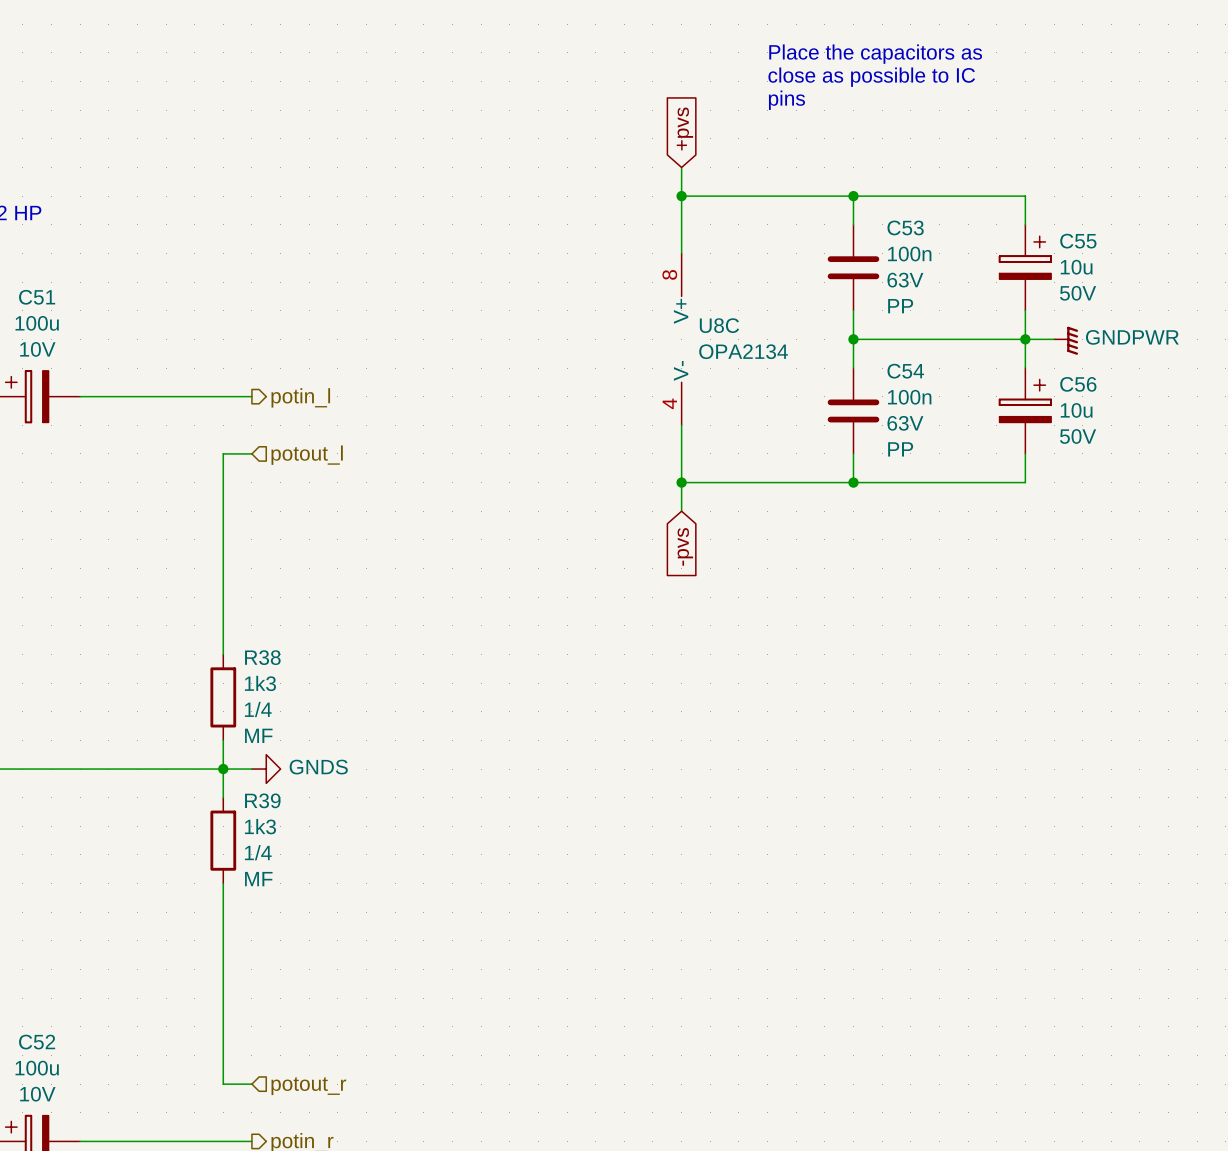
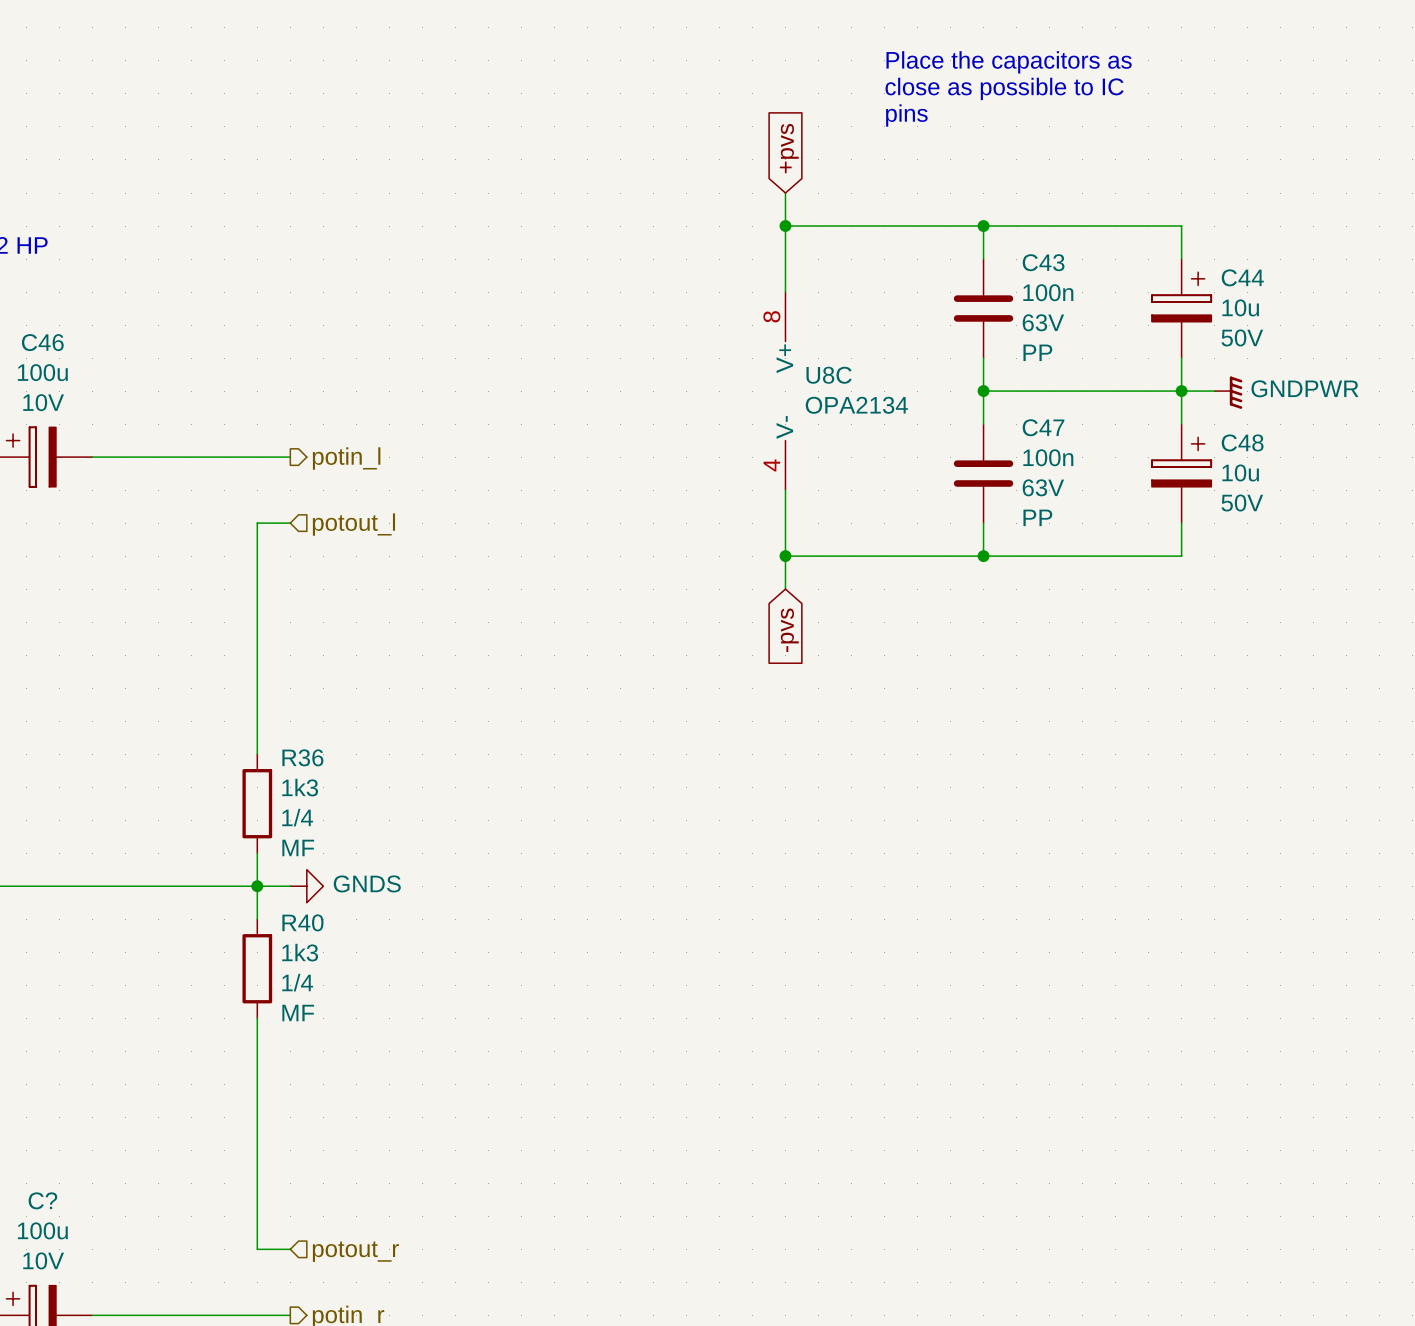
C53 name: C53 (905, 227) -> C43 (1043, 262)
C55 name: C55 (1078, 241) -> C44 (1242, 277)
C51 name: C51 (37, 297) -> C46 (42, 342)
C54 name: C54 (905, 371) -> C47 (1043, 427)
C56 name: C56 (1078, 384) -> C48 (1242, 442)
R38 name: R38 (262, 657) -> R36 (302, 757)
R39 name: R39 (262, 800) -> R40 (302, 922)
C52 name: C52 (37, 1042) -> C? (42, 1200)

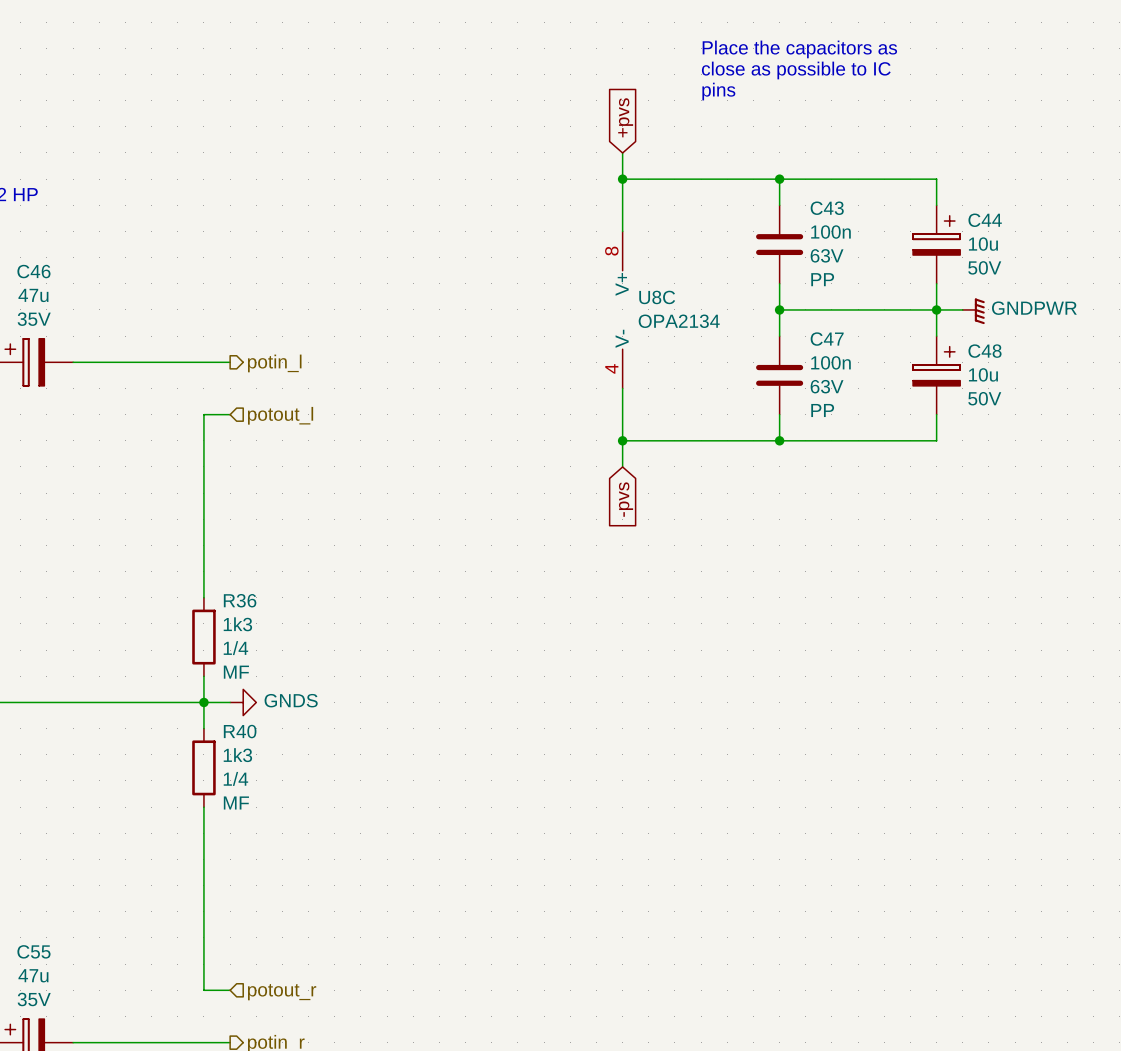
C46 value: 100u (42, 372) -> 47u (33, 295)
C46 text: 10V (43, 402) -> 35V (34, 319)
C? name: C? (42, 1200) -> C55 (33, 951)
C? value: 100u (42, 1230) -> 47u (33, 975)
C? text: 10V (43, 1260) -> 35V (34, 999)

